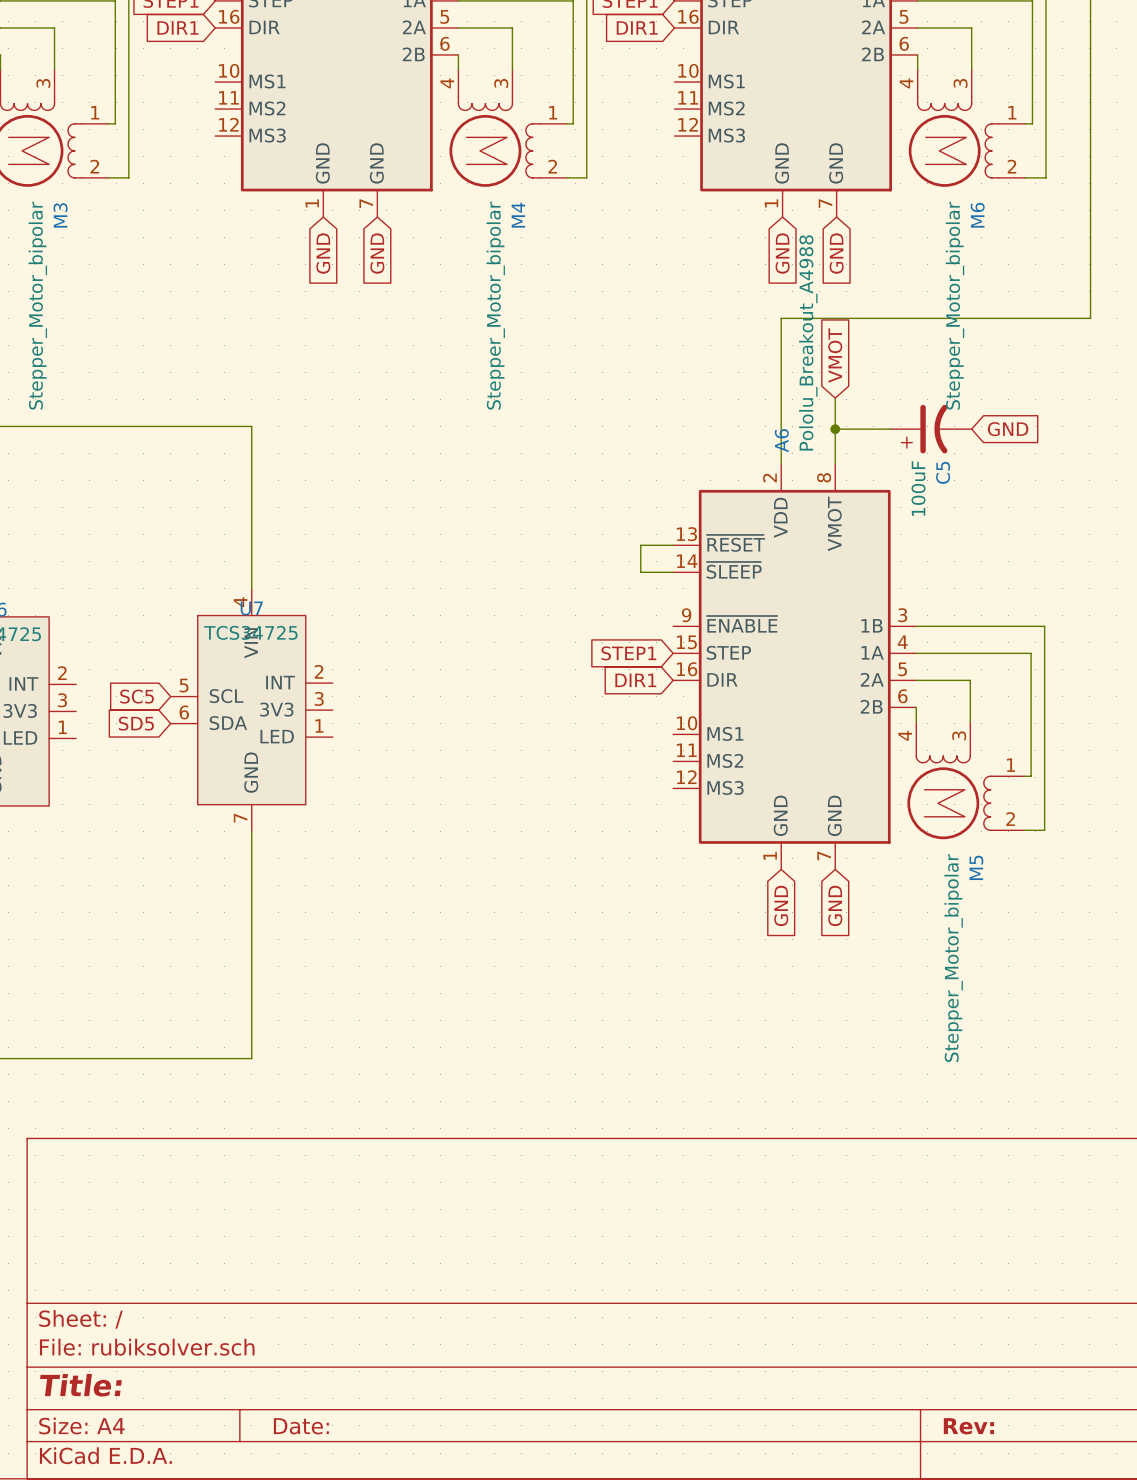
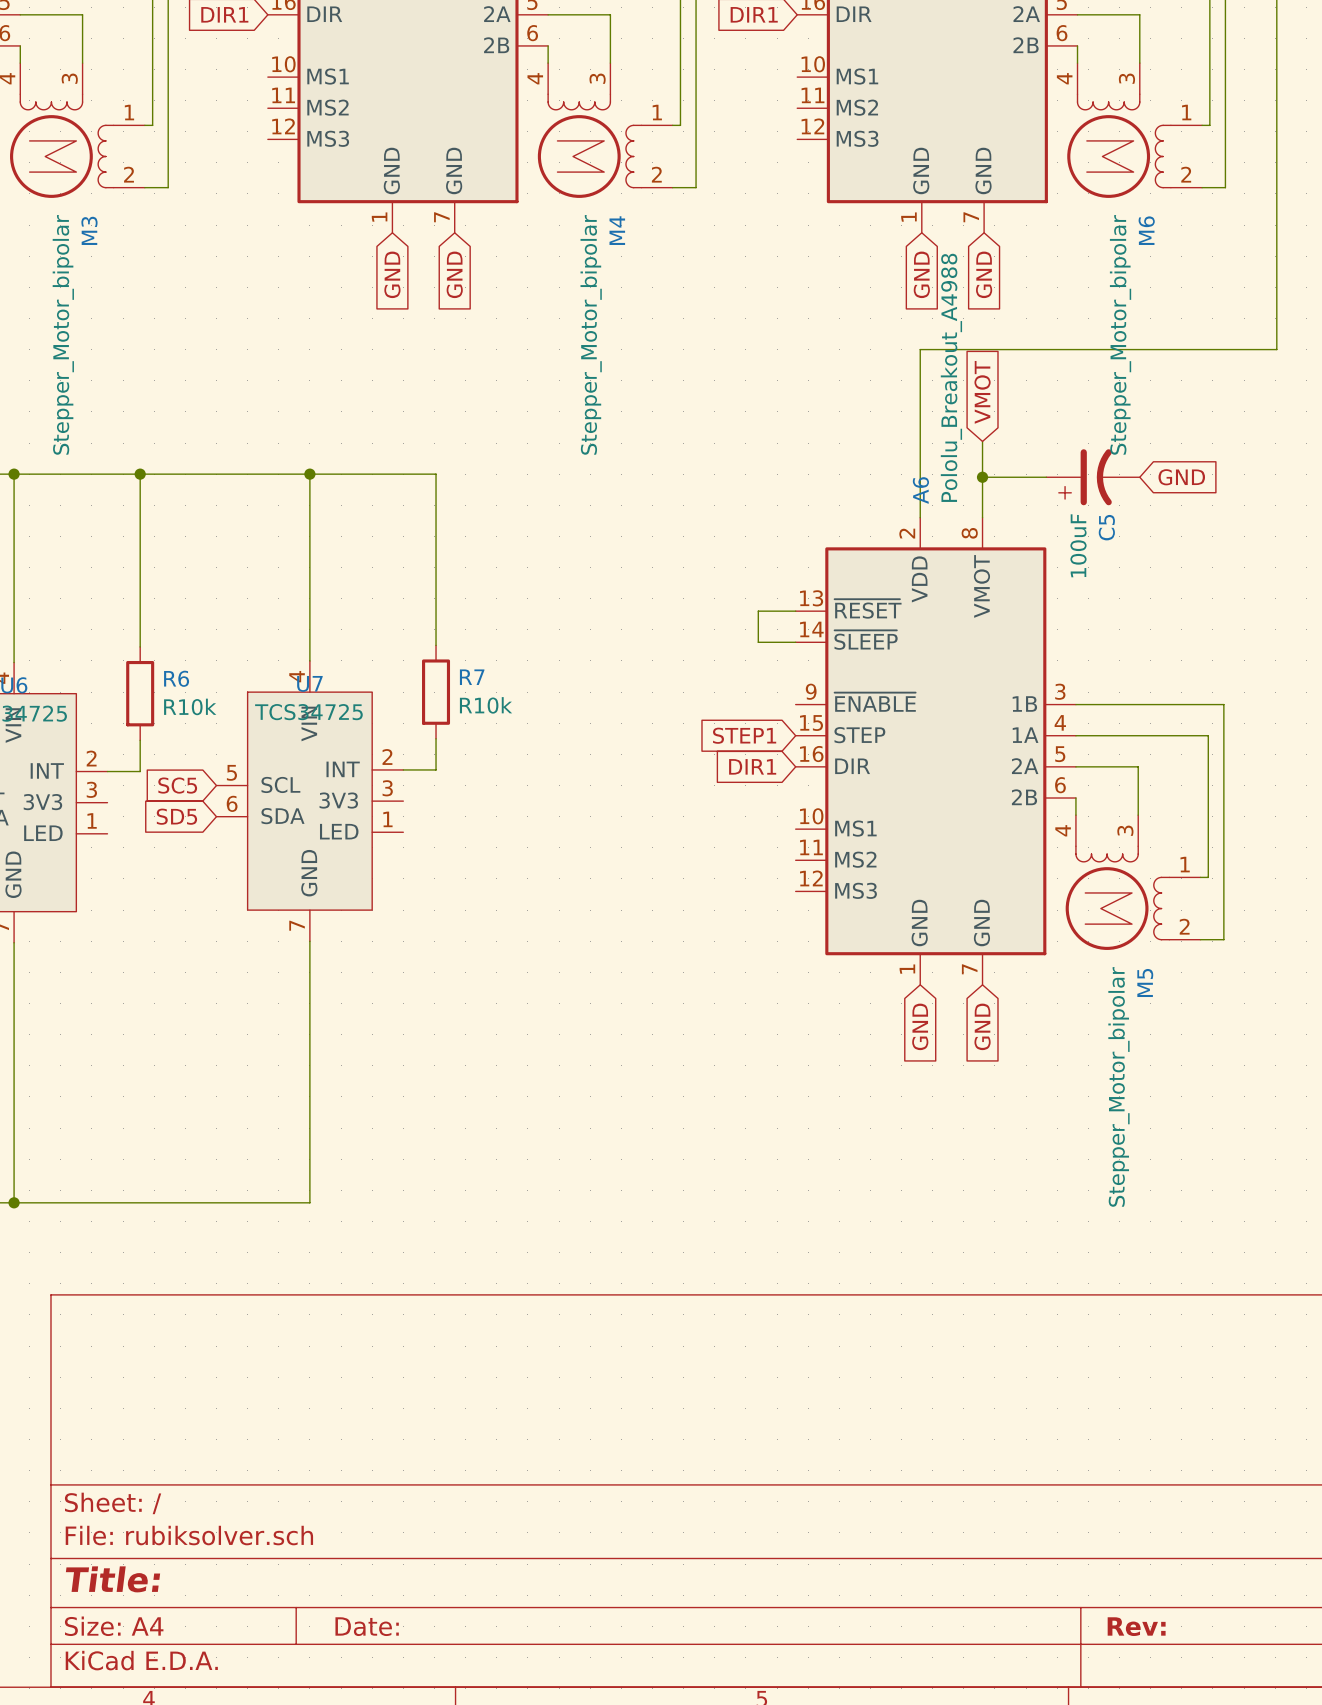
wire: none -> (140, 474) (140, 646)
junction: none -> (140, 474)
wire: none -> (309, 474) (436, 474) (436, 645)
junction: none -> (309, 474)
R7: none -> R10k (436, 692)
R6: none -> R10k (140, 693)
wire: none -> (436, 738) (436, 769) (403, 769)
wire: none -> (140, 740) (140, 771) (107, 771)

